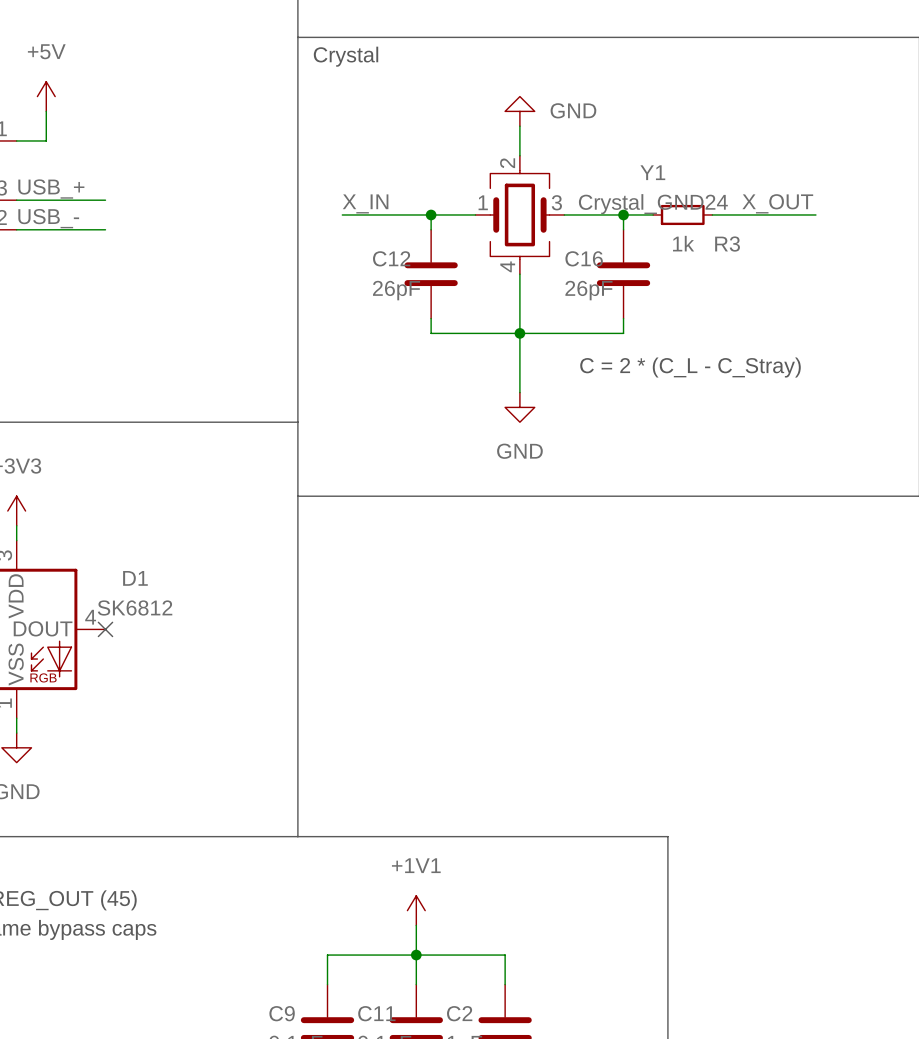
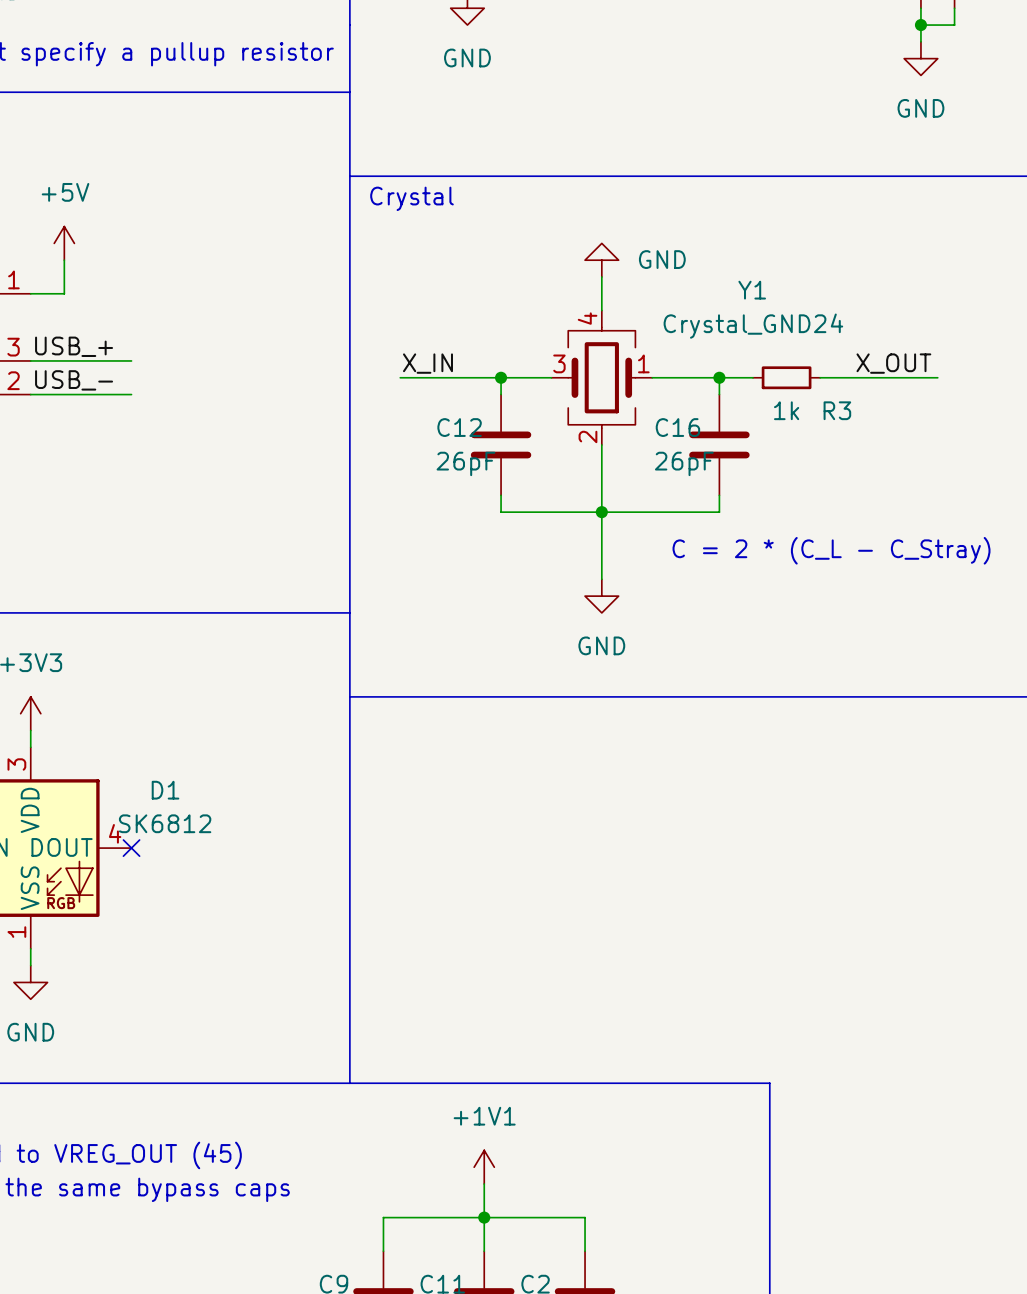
Y1 name position: Y1 (652, 172) -> Y1 (752, 290)
Y1 value position: Crystal_GND24 (653, 204) -> Crystal_GND24 (753, 326)
Y1 rotation: 0° (519, 214) -> 180° (601, 377)

